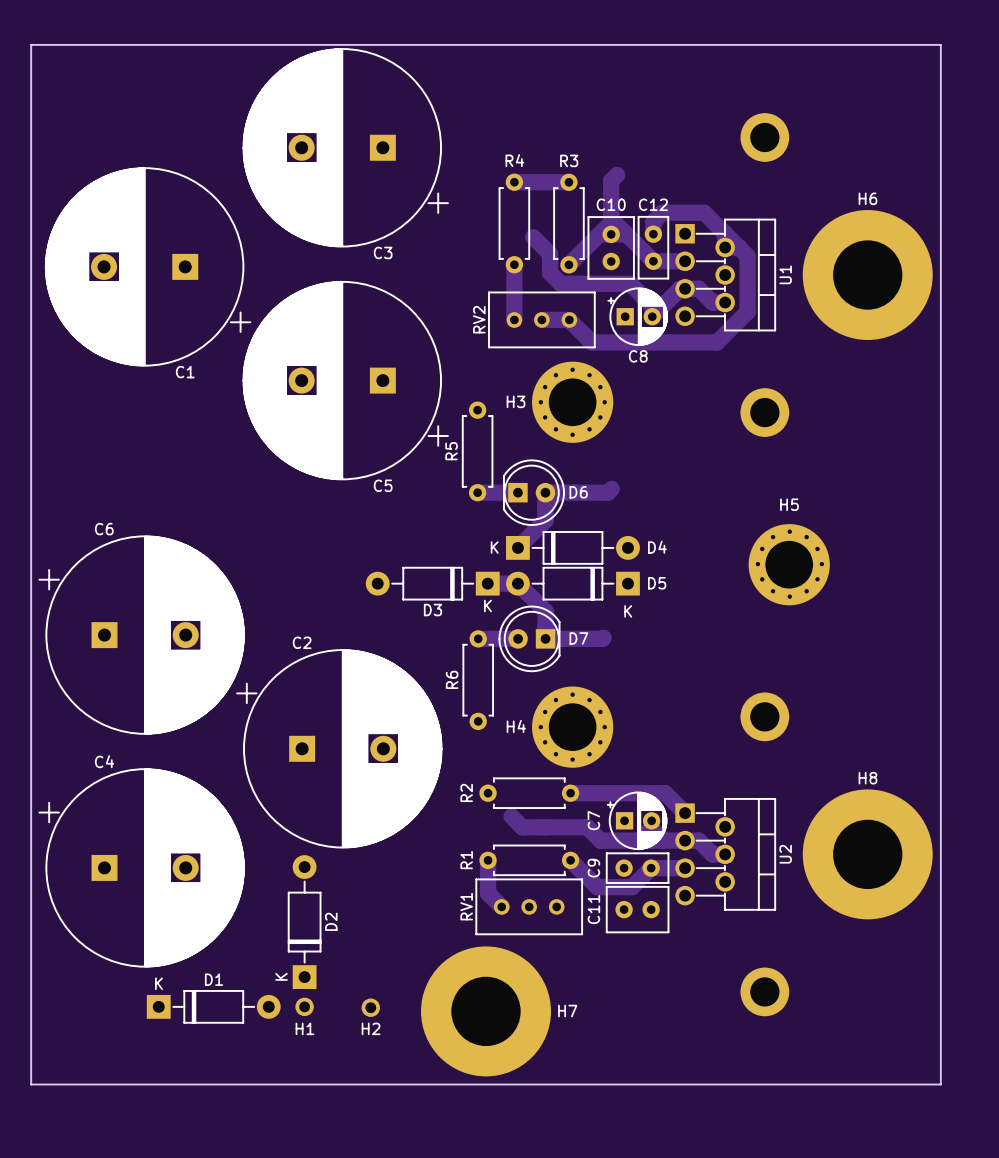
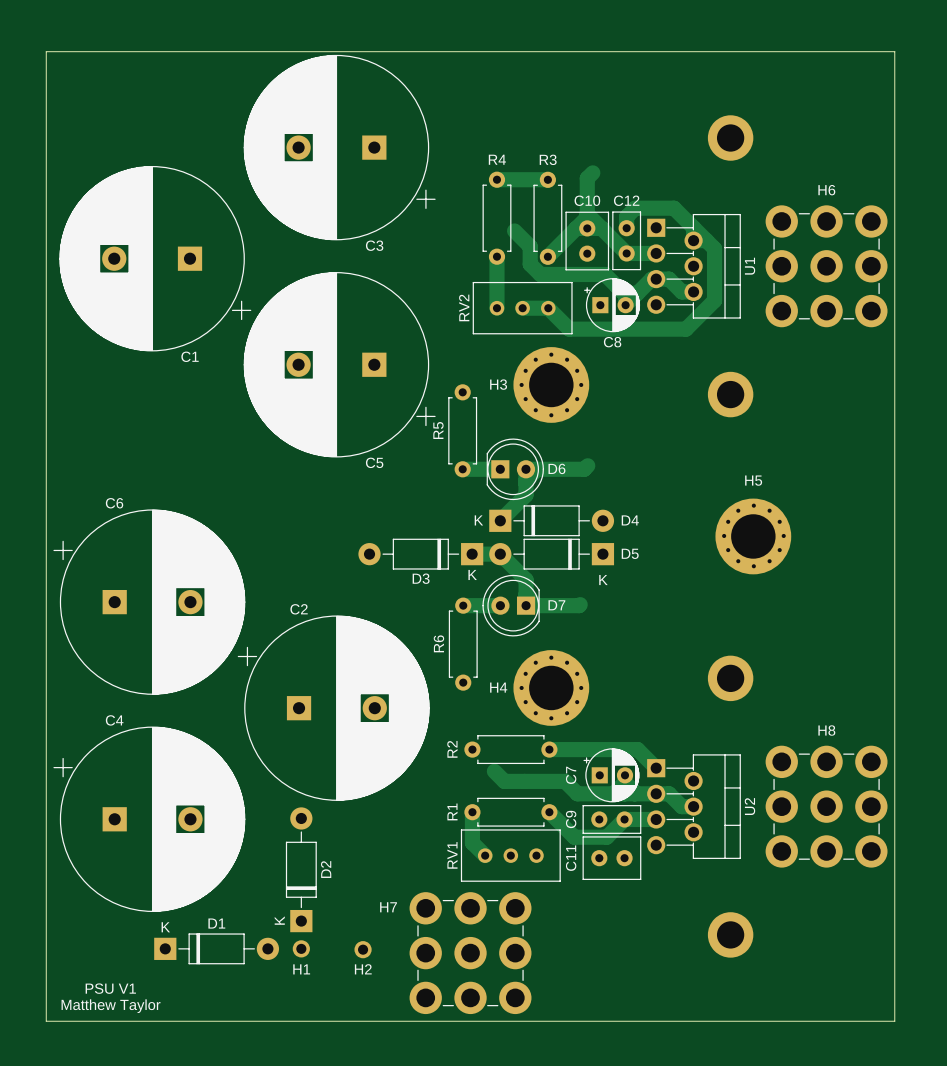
H6 footprint: [802, 210, 933, 341] -> [765, 205, 888, 328]
H8 footprint: [802, 789, 933, 920] -> [765, 745, 888, 868]
H7 footprint: [421, 946, 551, 1077] -> [409, 892, 532, 1015]
H7 name position: H7 (567, 1011) -> H7 (388, 907)
text: none -> PSU V1 (110, 988)
text: none -> Matthew Taylor (111, 1006)

